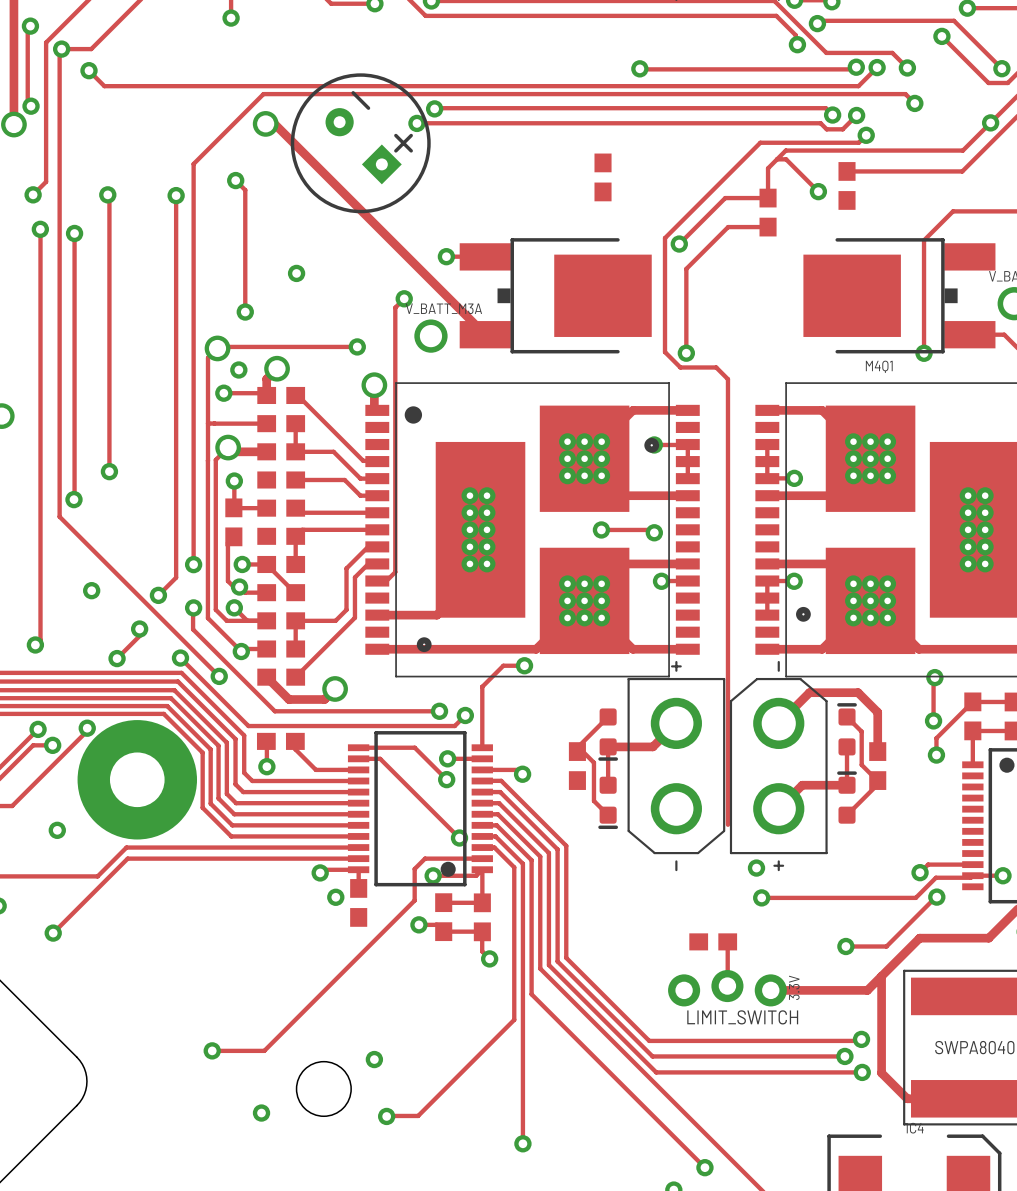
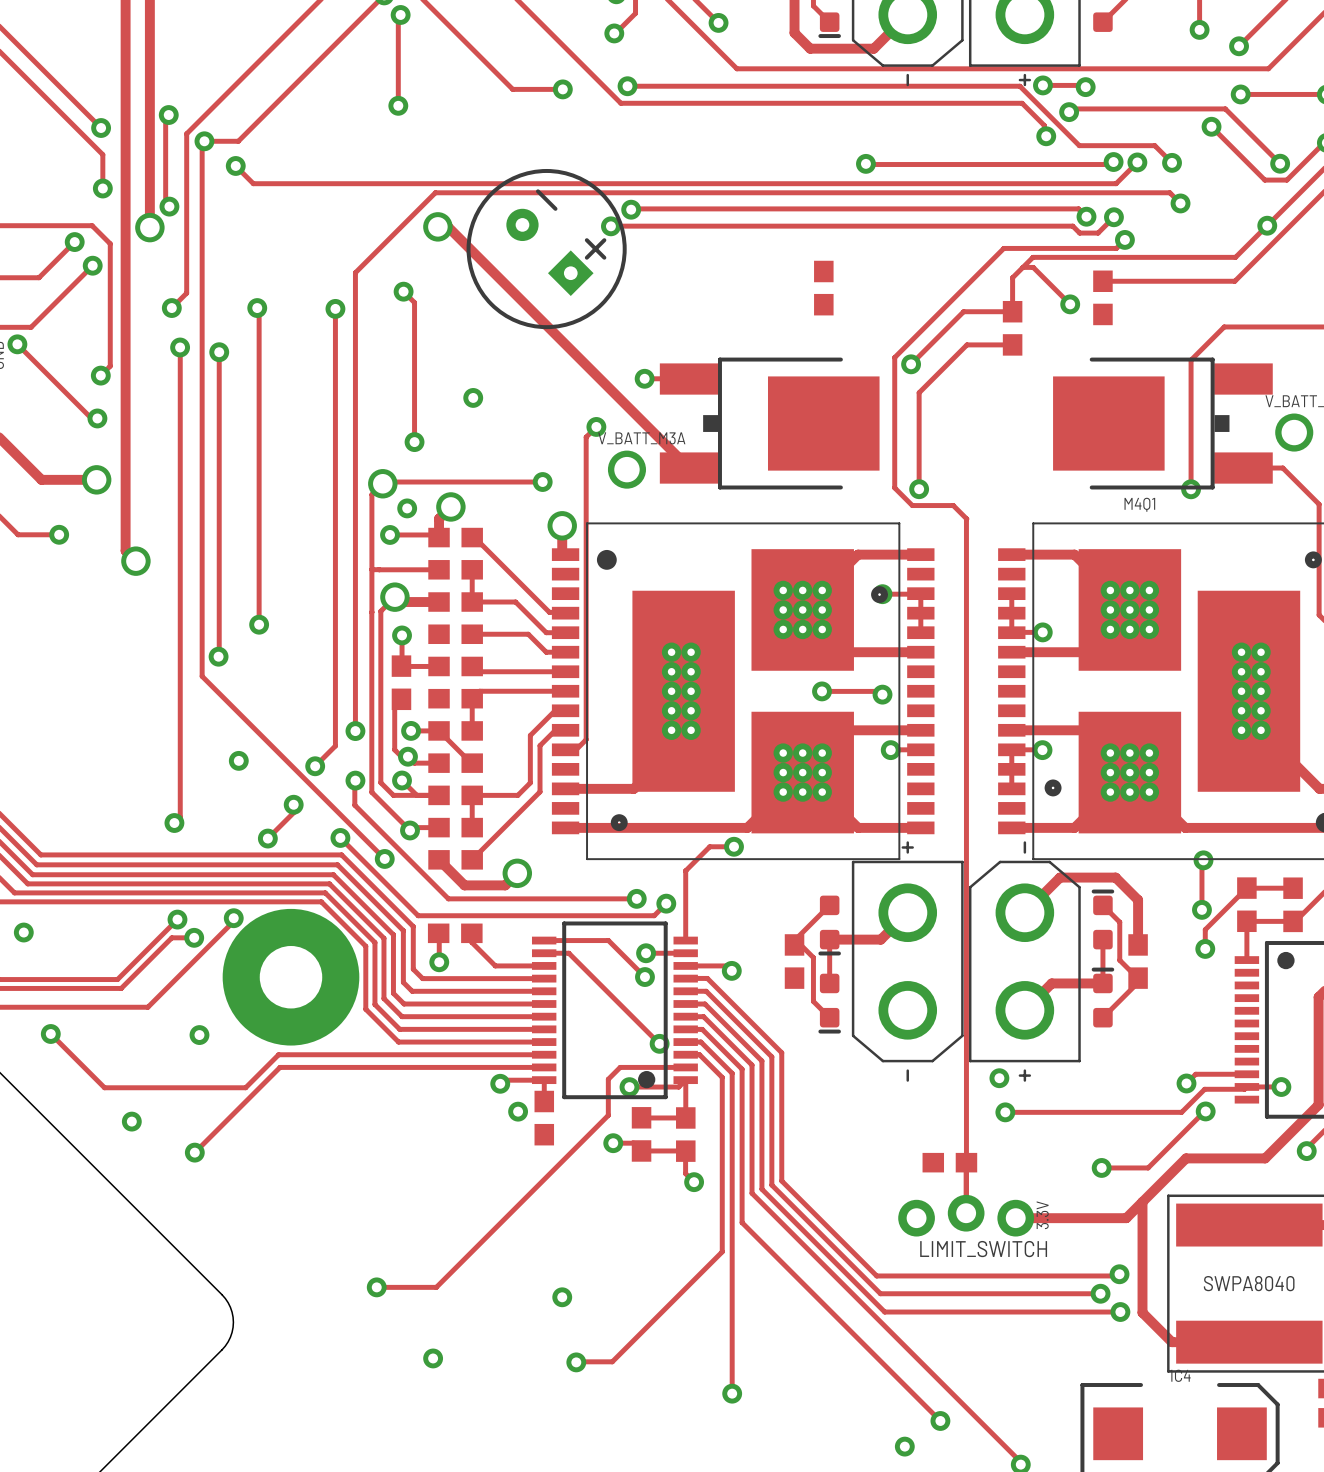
track: (727, 379) (727, 824) -> (966, 518) (966, 1213)
round board edge: [296, 1061, 352, 1117] -> none

